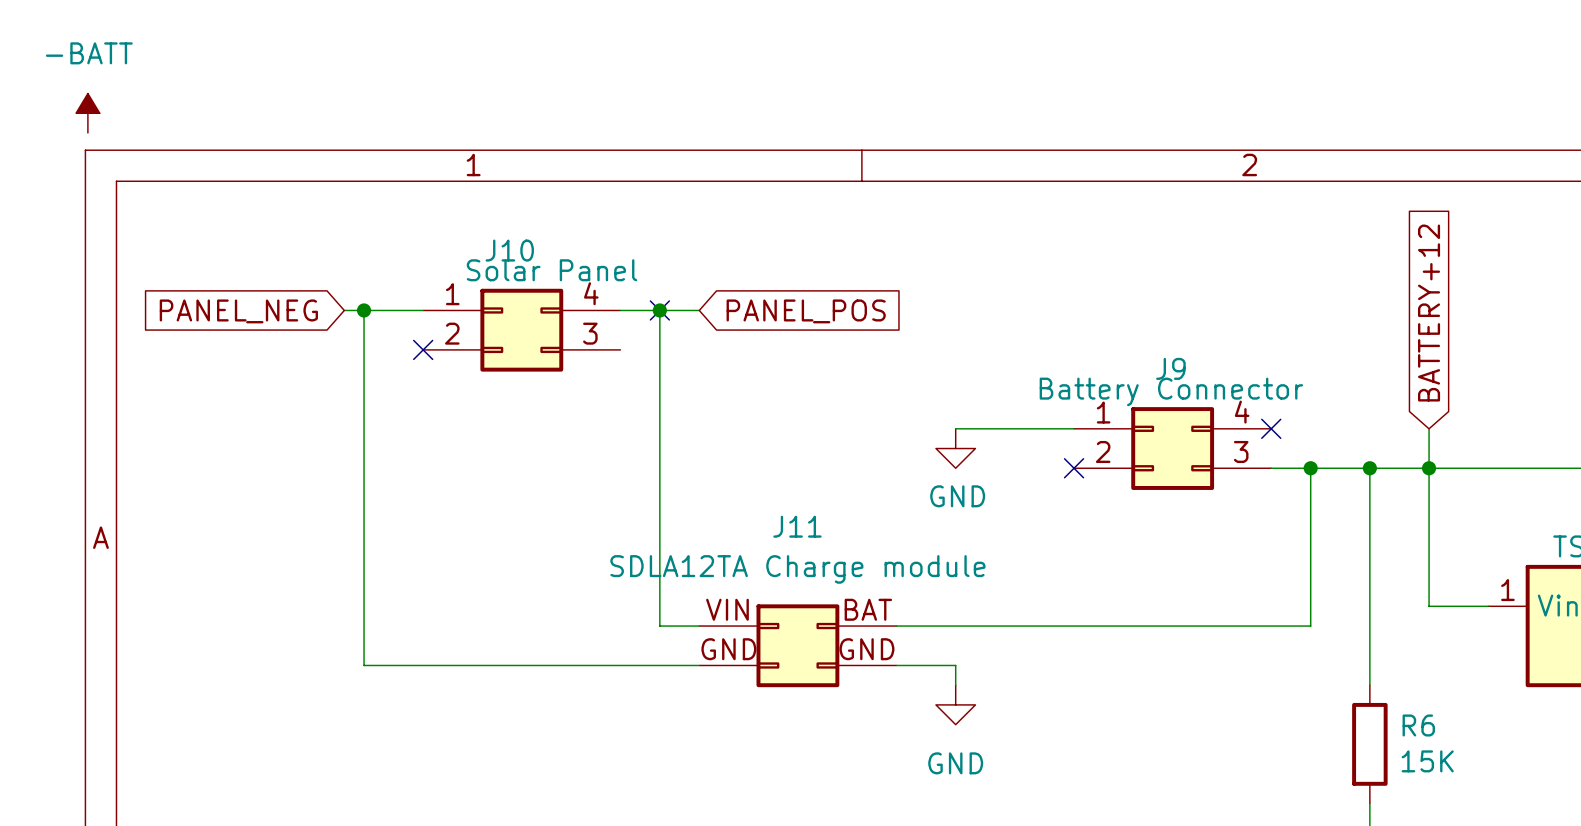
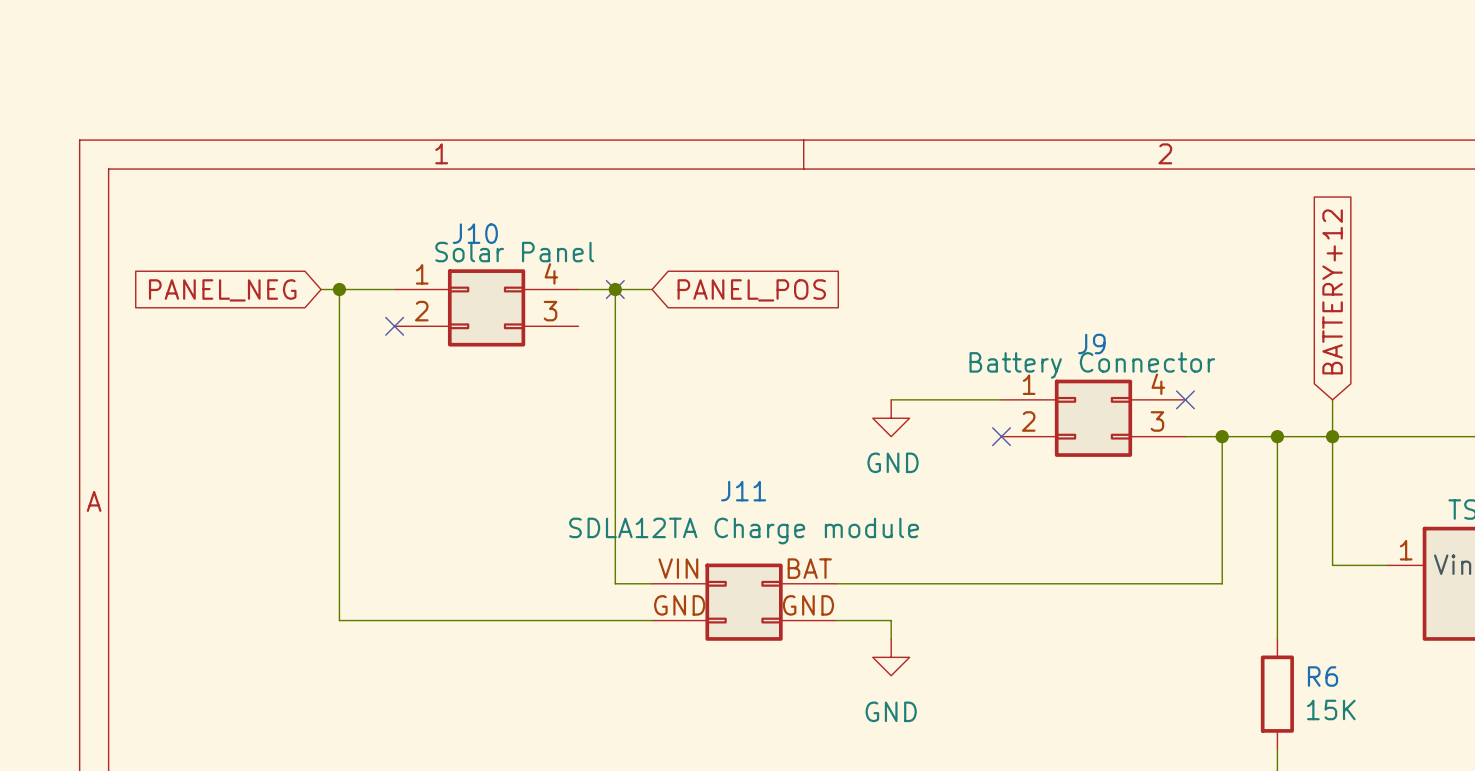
power symbol: -BATT (87, 113) -> none

